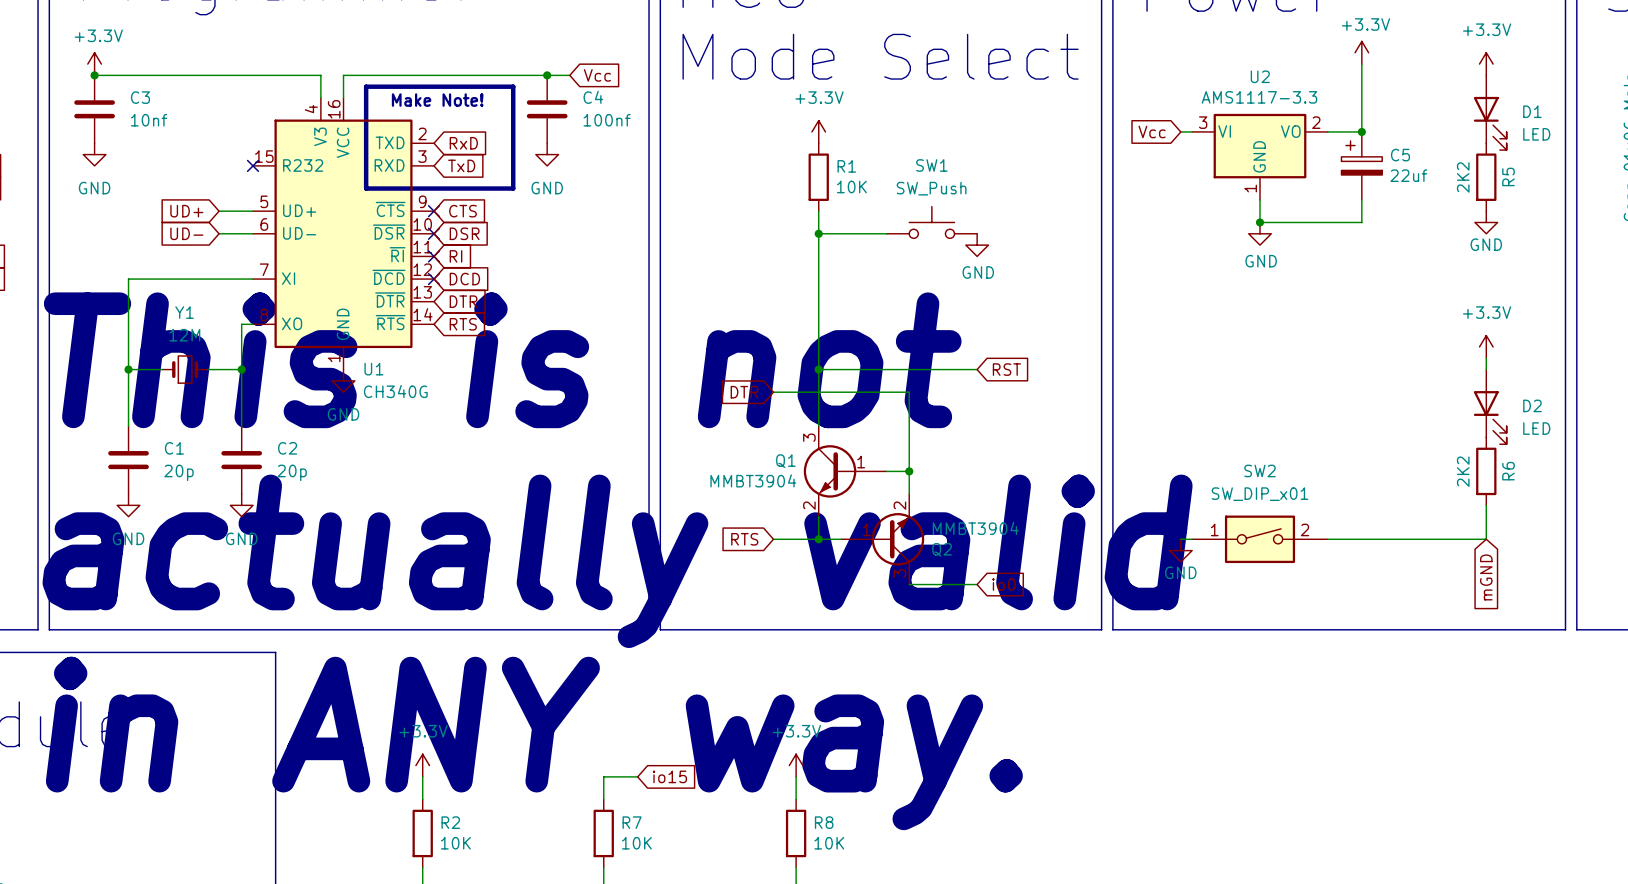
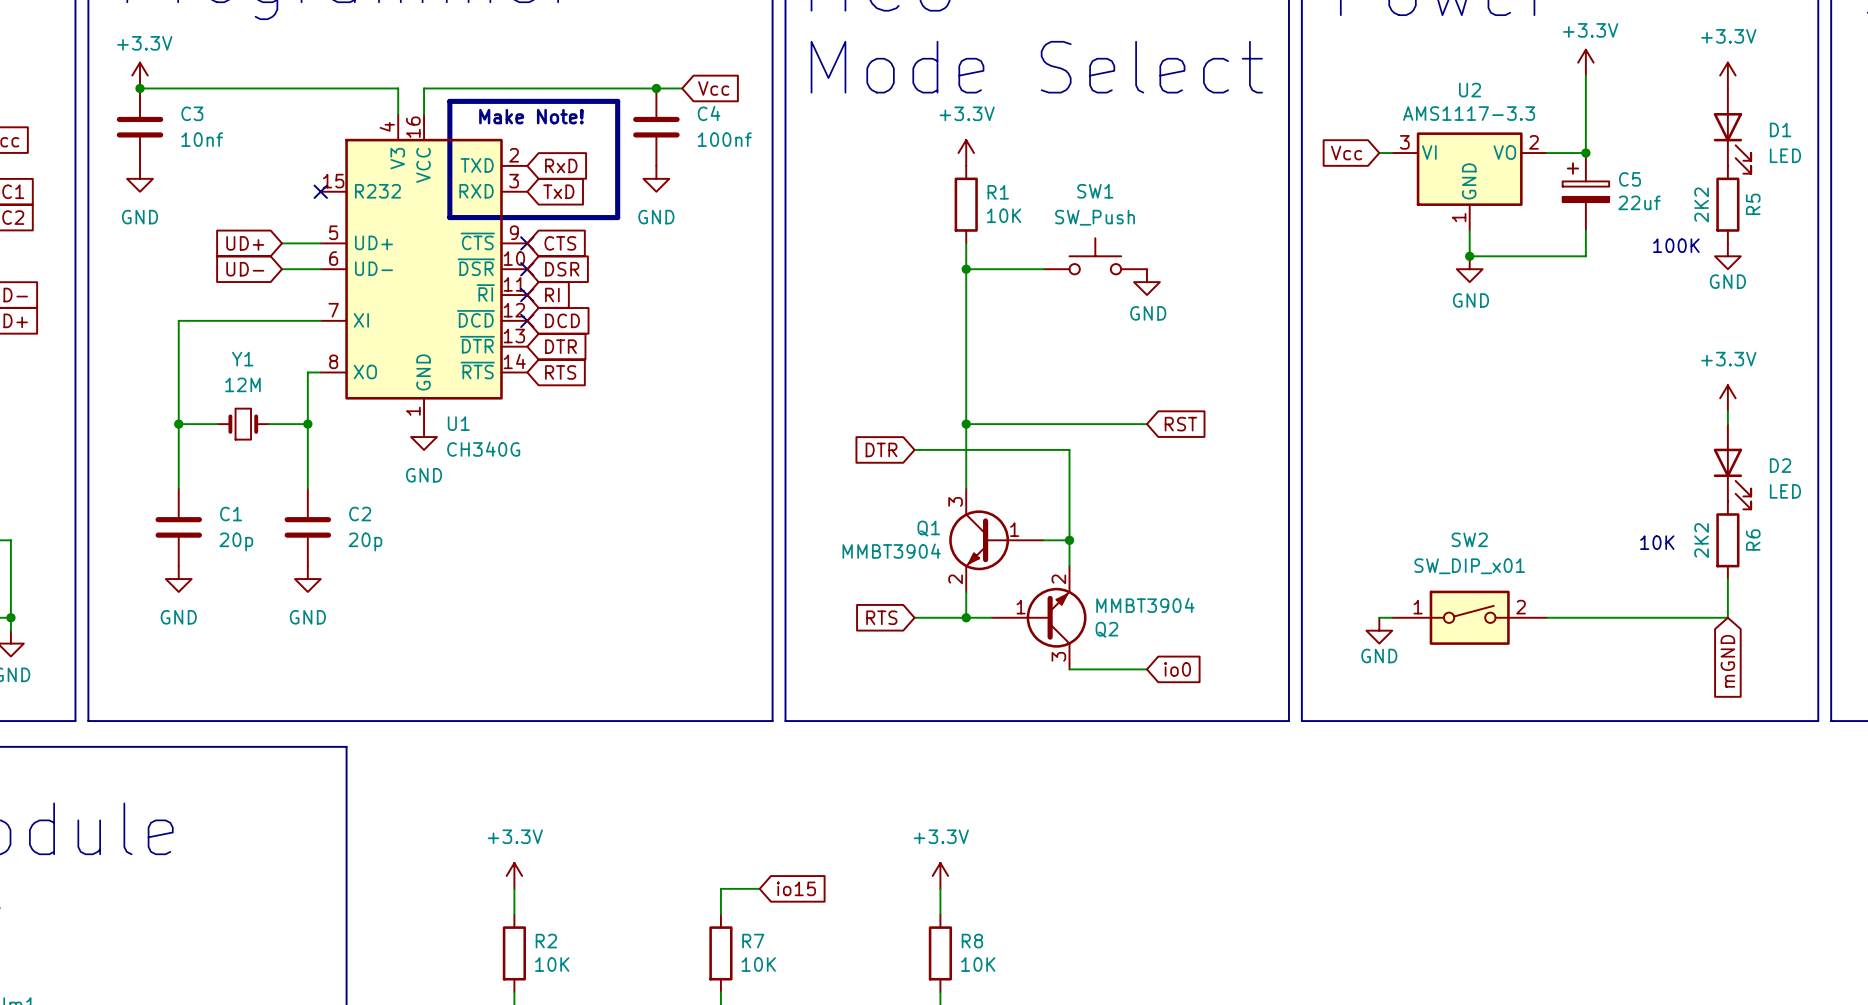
text: none -> 100K (1676, 245)
text: This is not (502, 360) -> none
text: none -> 10K (1657, 542)
text: actually valid (617, 561) -> none
text: in ANY way. (534, 743) -> none

